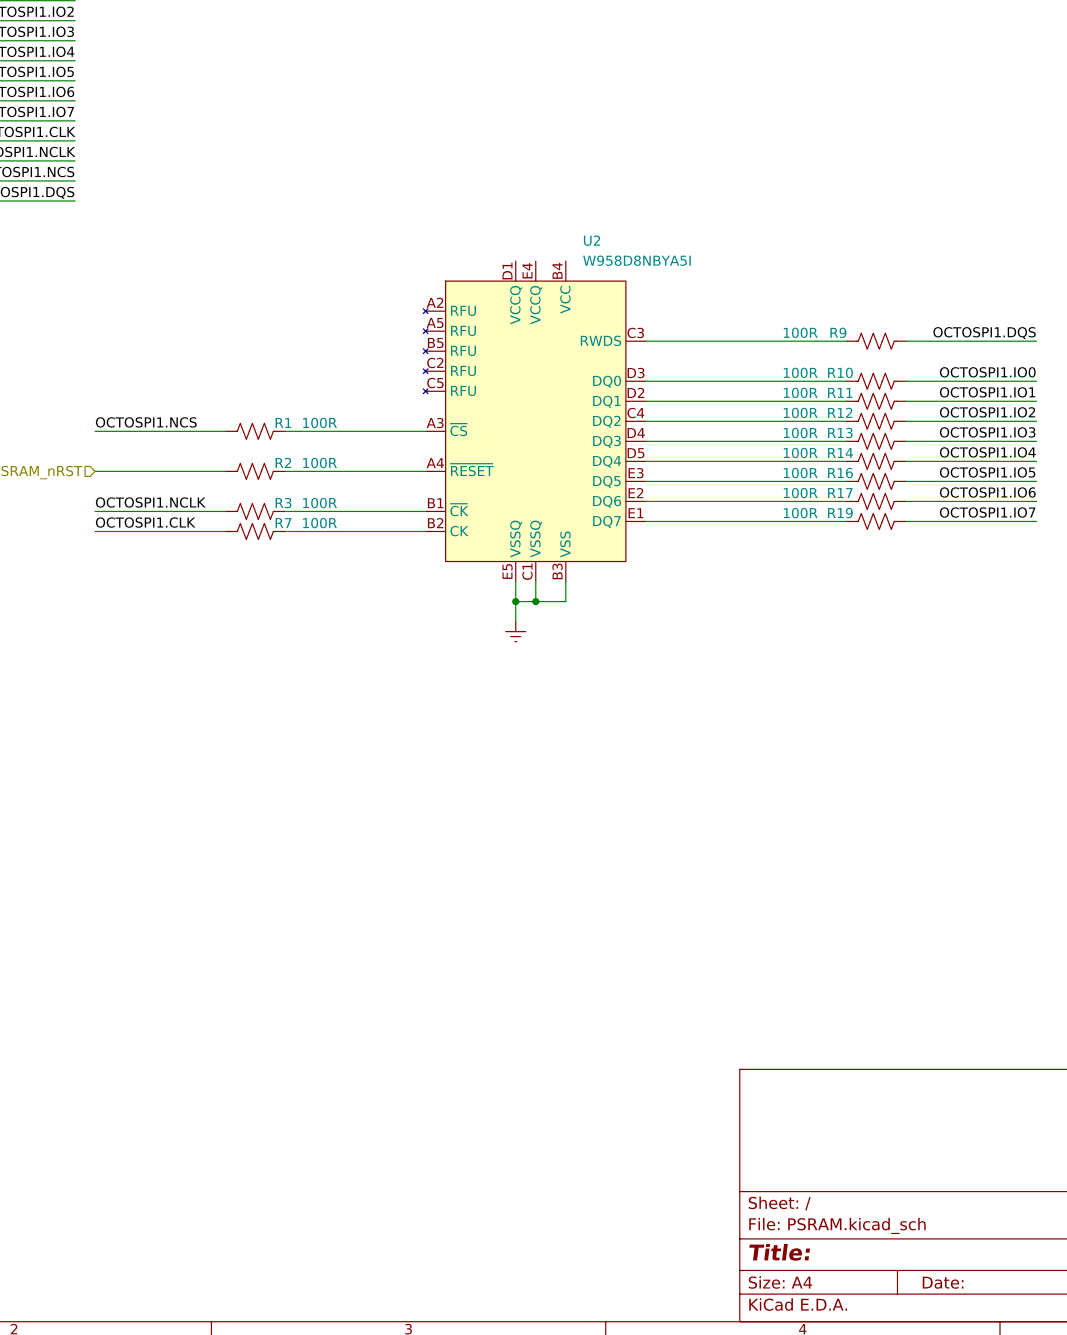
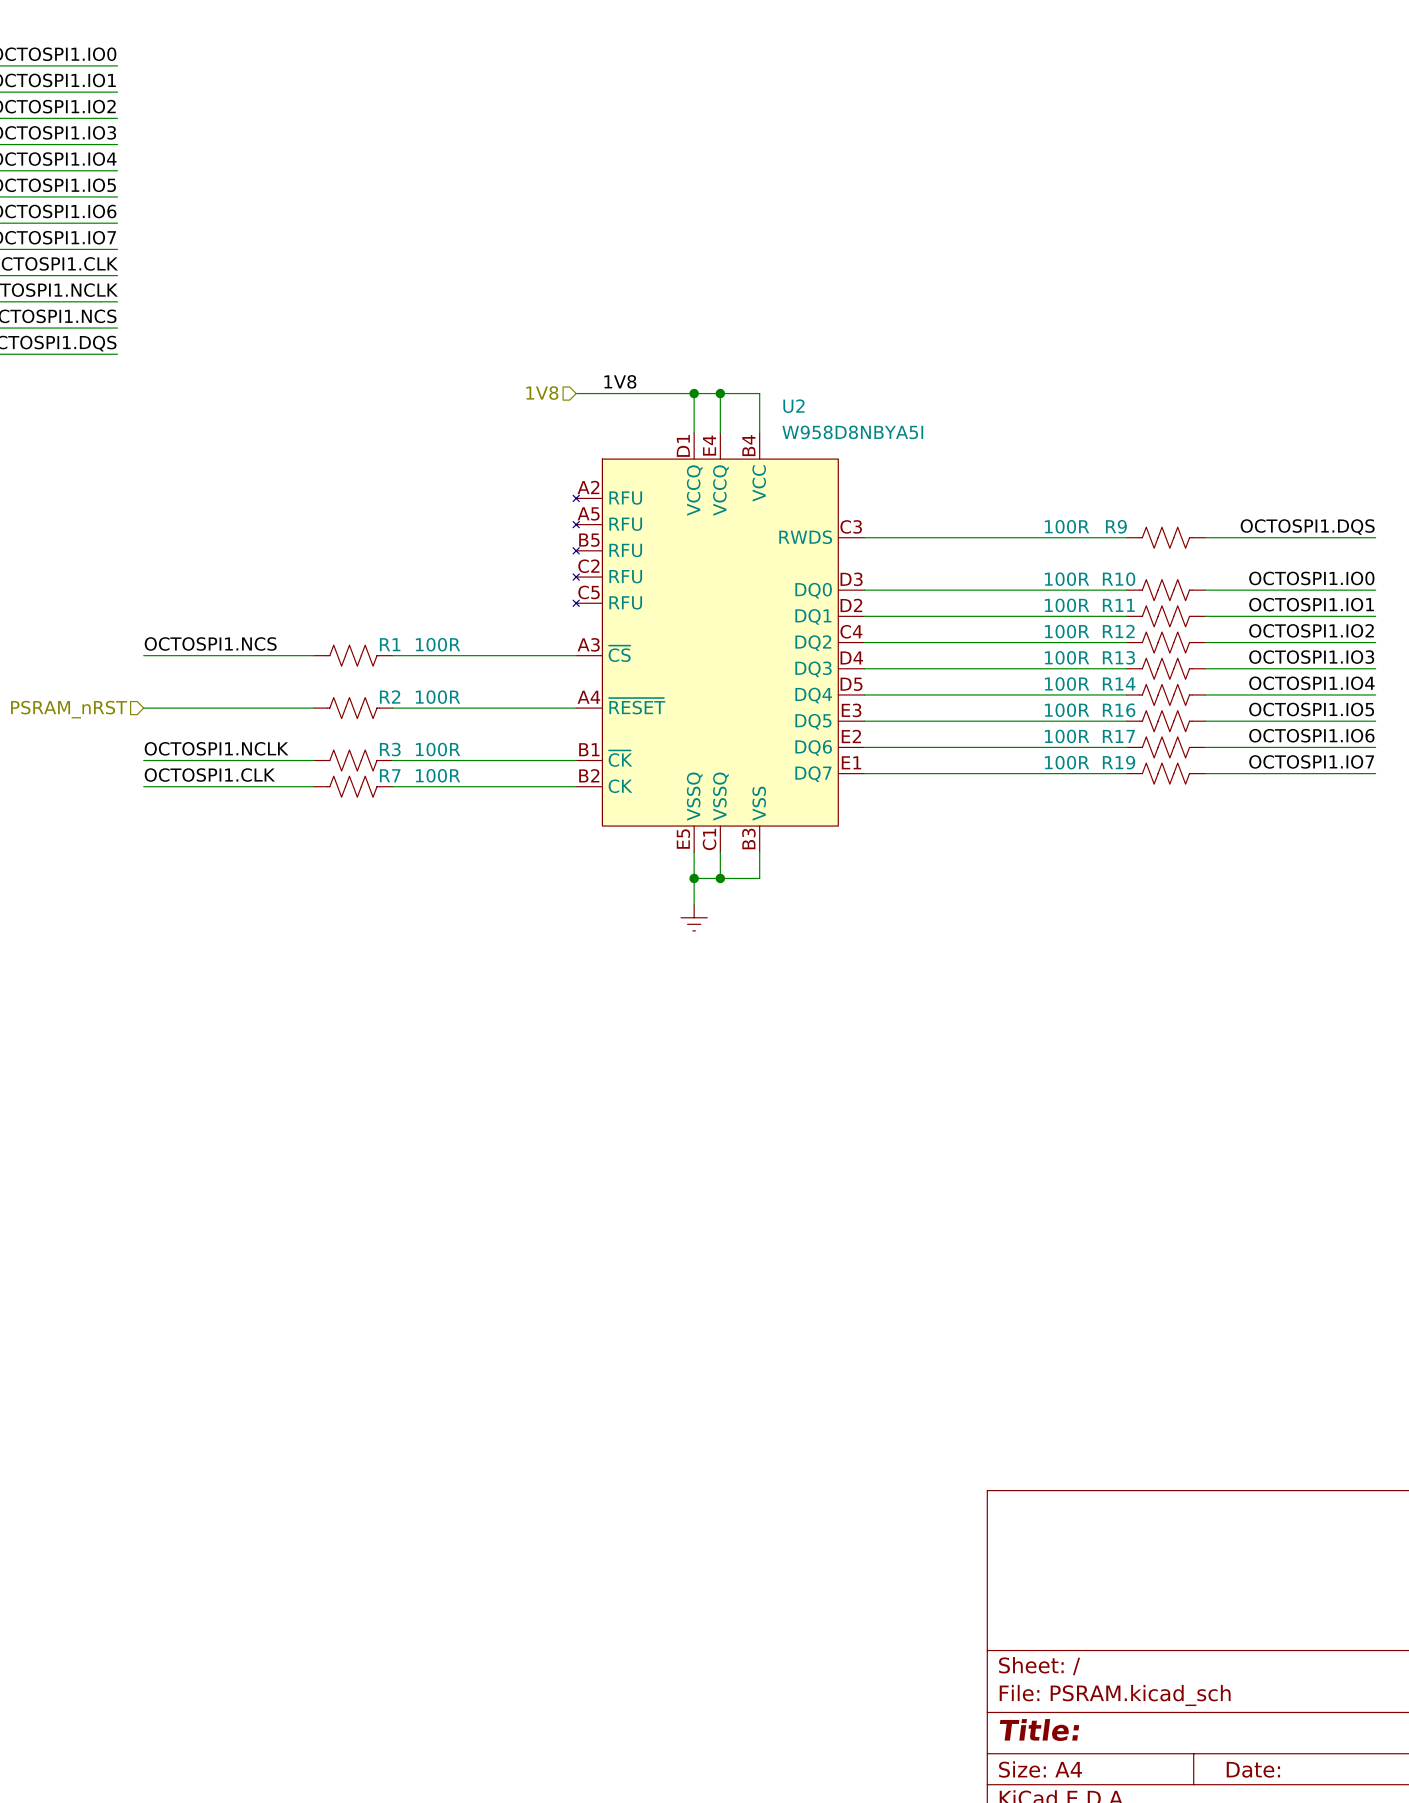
label: none -> 1V8 (620, 381)
hierarchical label: none -> 1V8 (542, 393)
wire: none -> (576, 393) (759, 393) (759, 432)
wire: none -> (694, 393) (694, 432)
junction: none -> (694, 393)
wire: none -> (720, 393) (720, 432)
junction: none -> (720, 393)

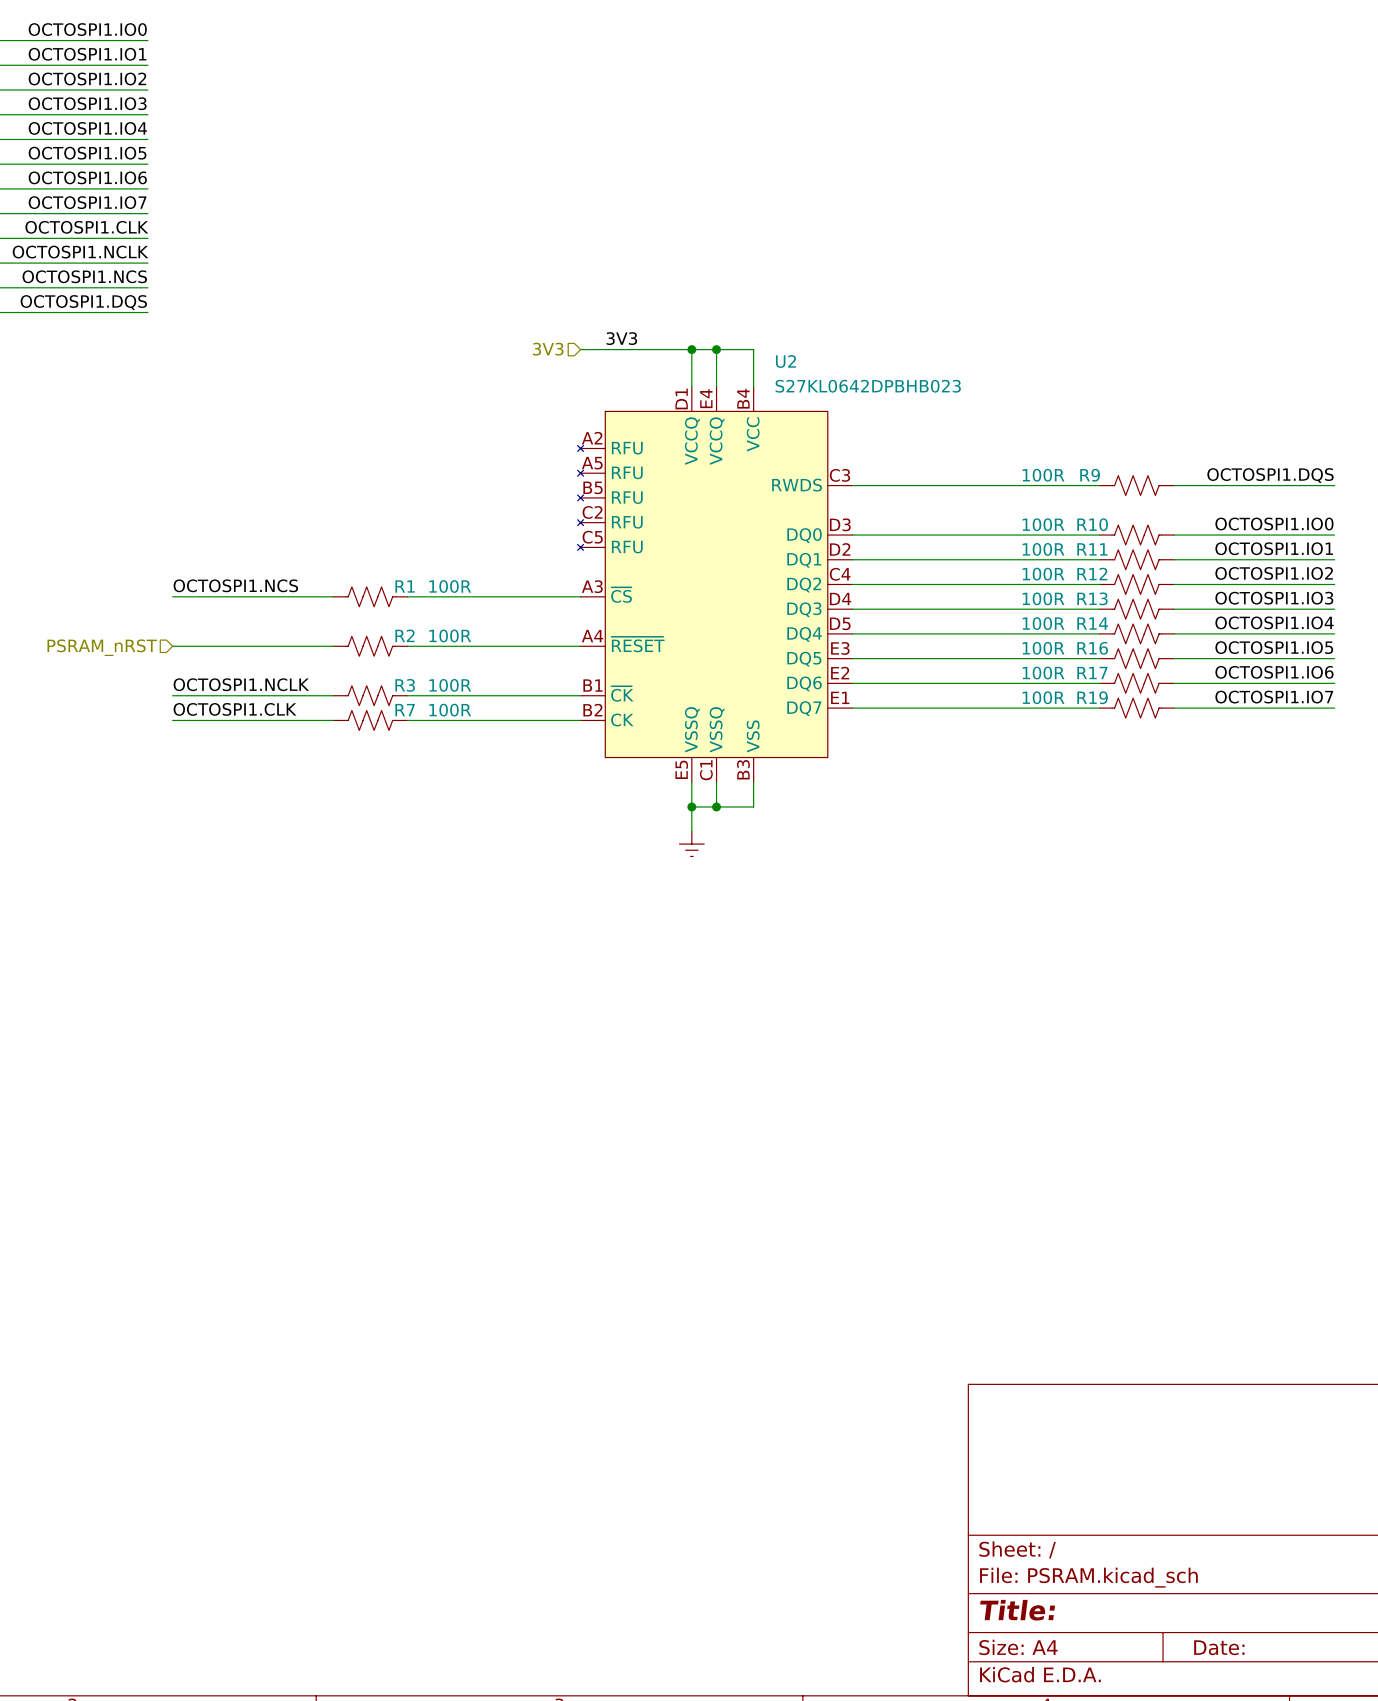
label: 1V8 (620, 381) -> 3V3 (621, 338)
hierarchical label: 1V8 (542, 393) -> 3V3 (548, 349)
U2 value: W958D8NBYA5I (852, 432) -> S27KL0642DPBHB023 (868, 386)

